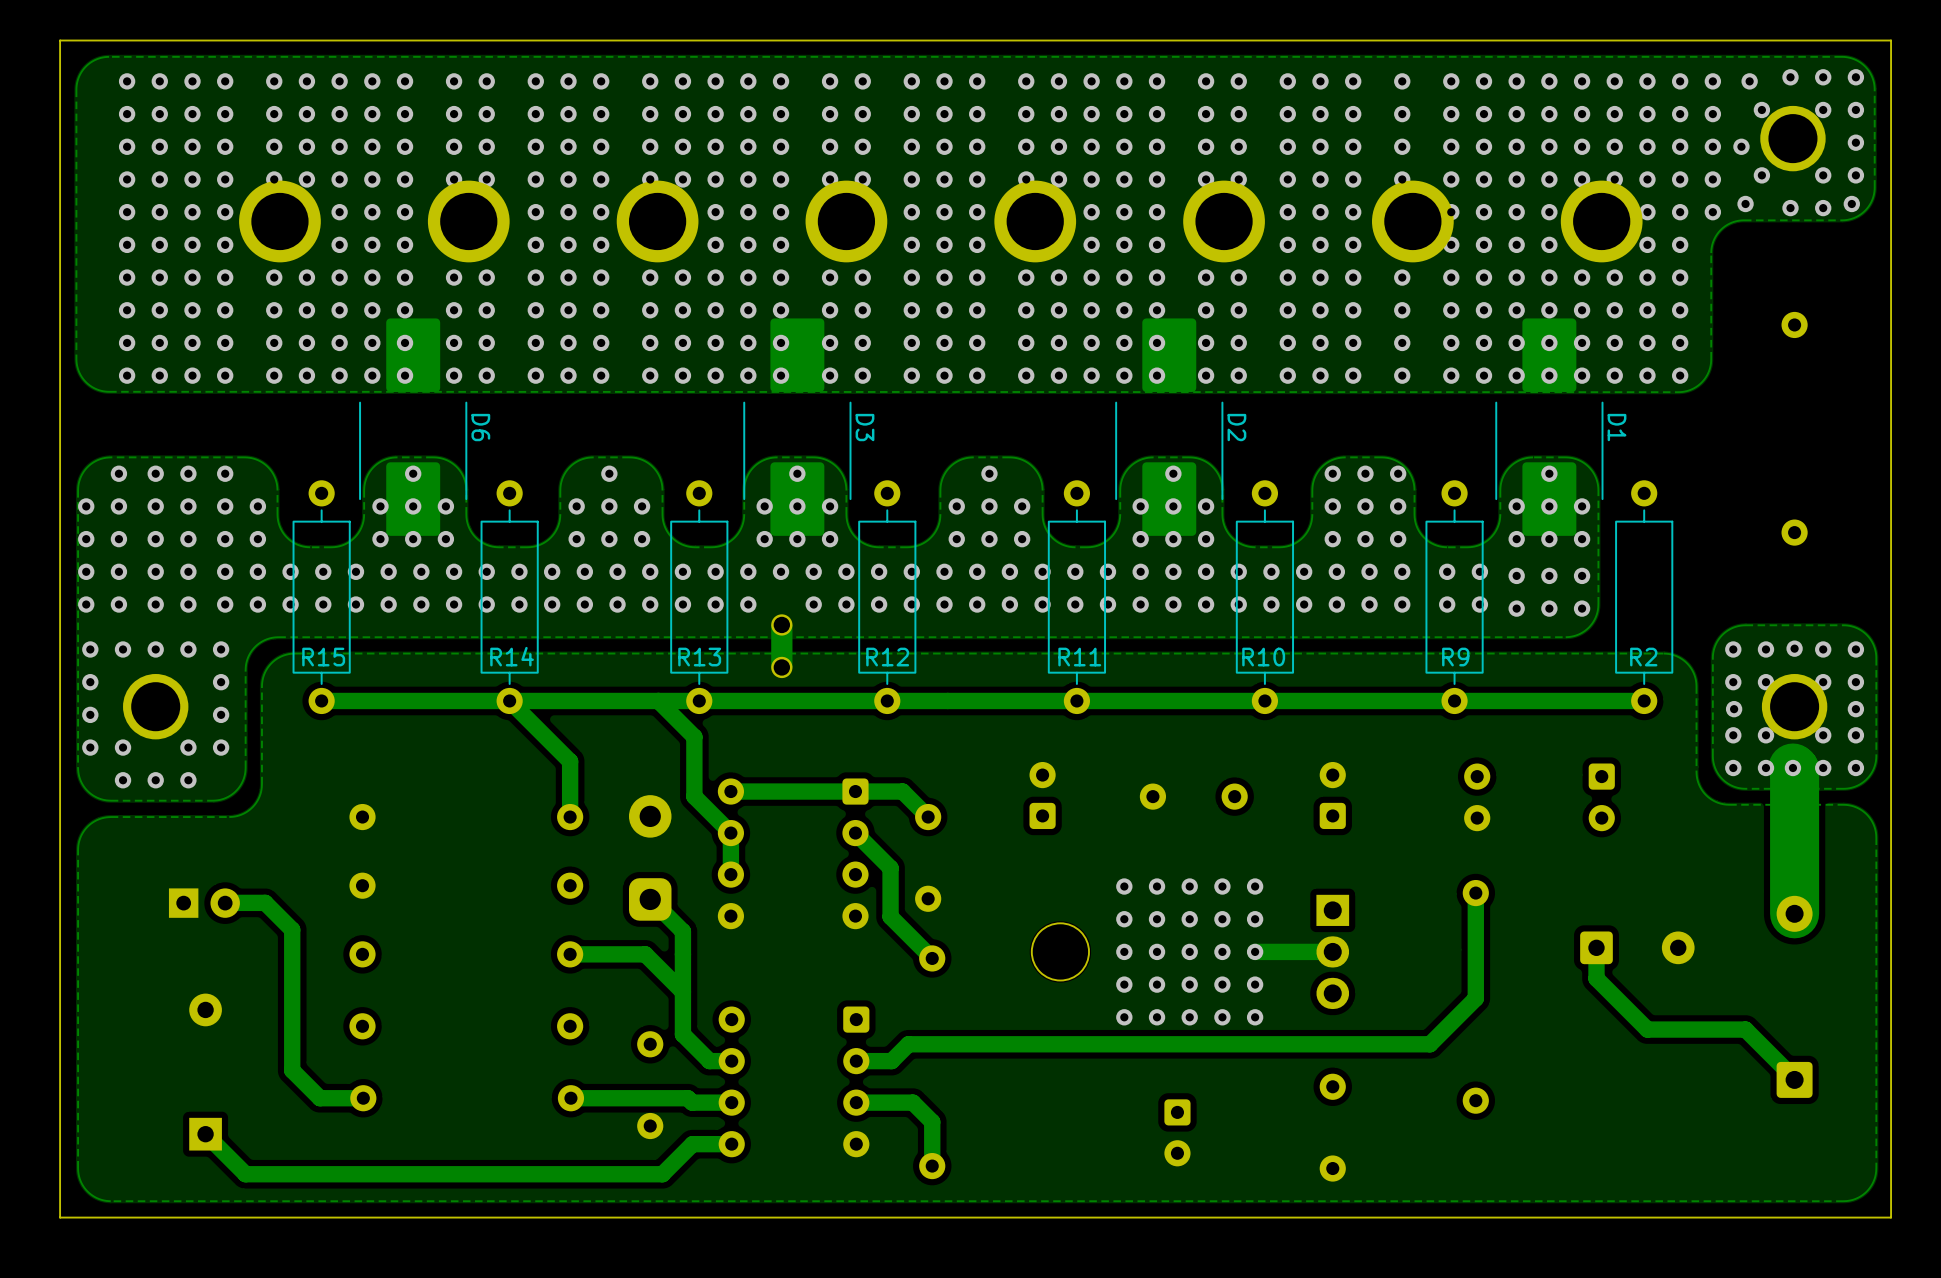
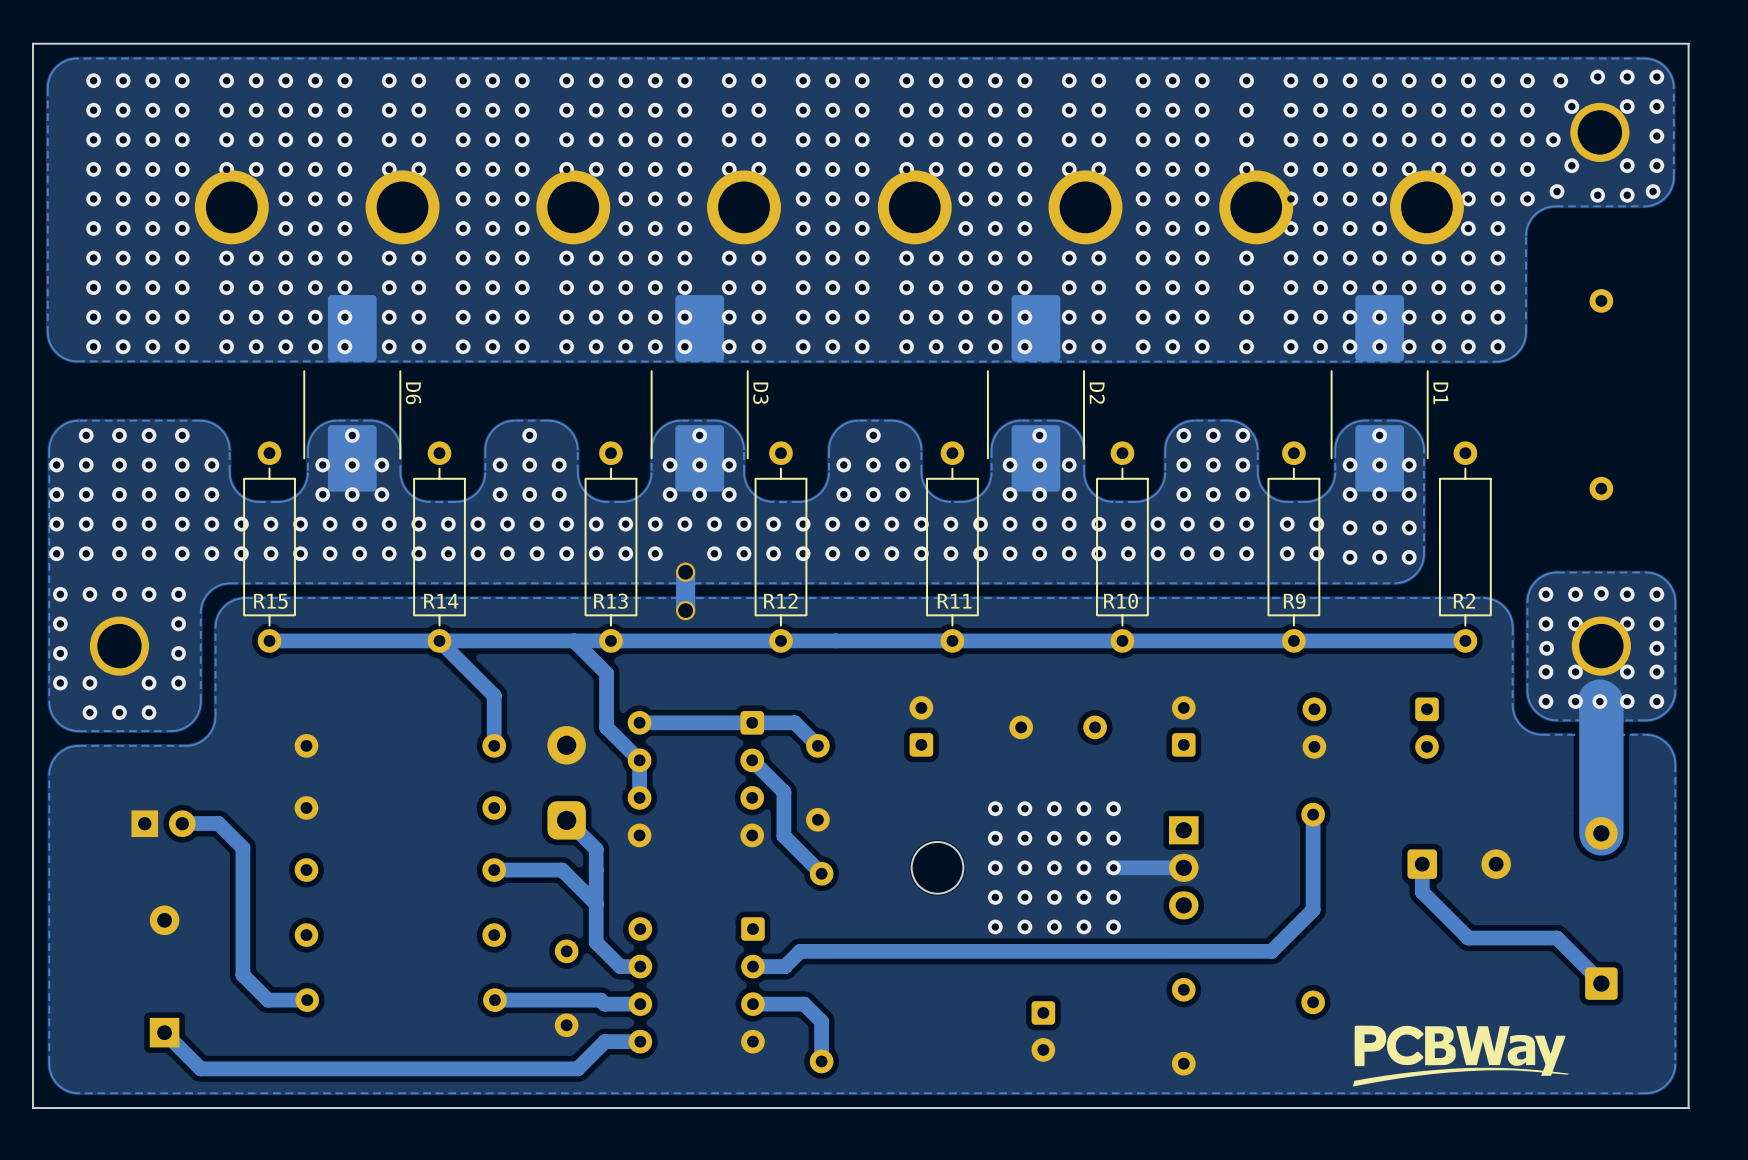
drawing: none -> [1353, 1025, 1569, 1087]

